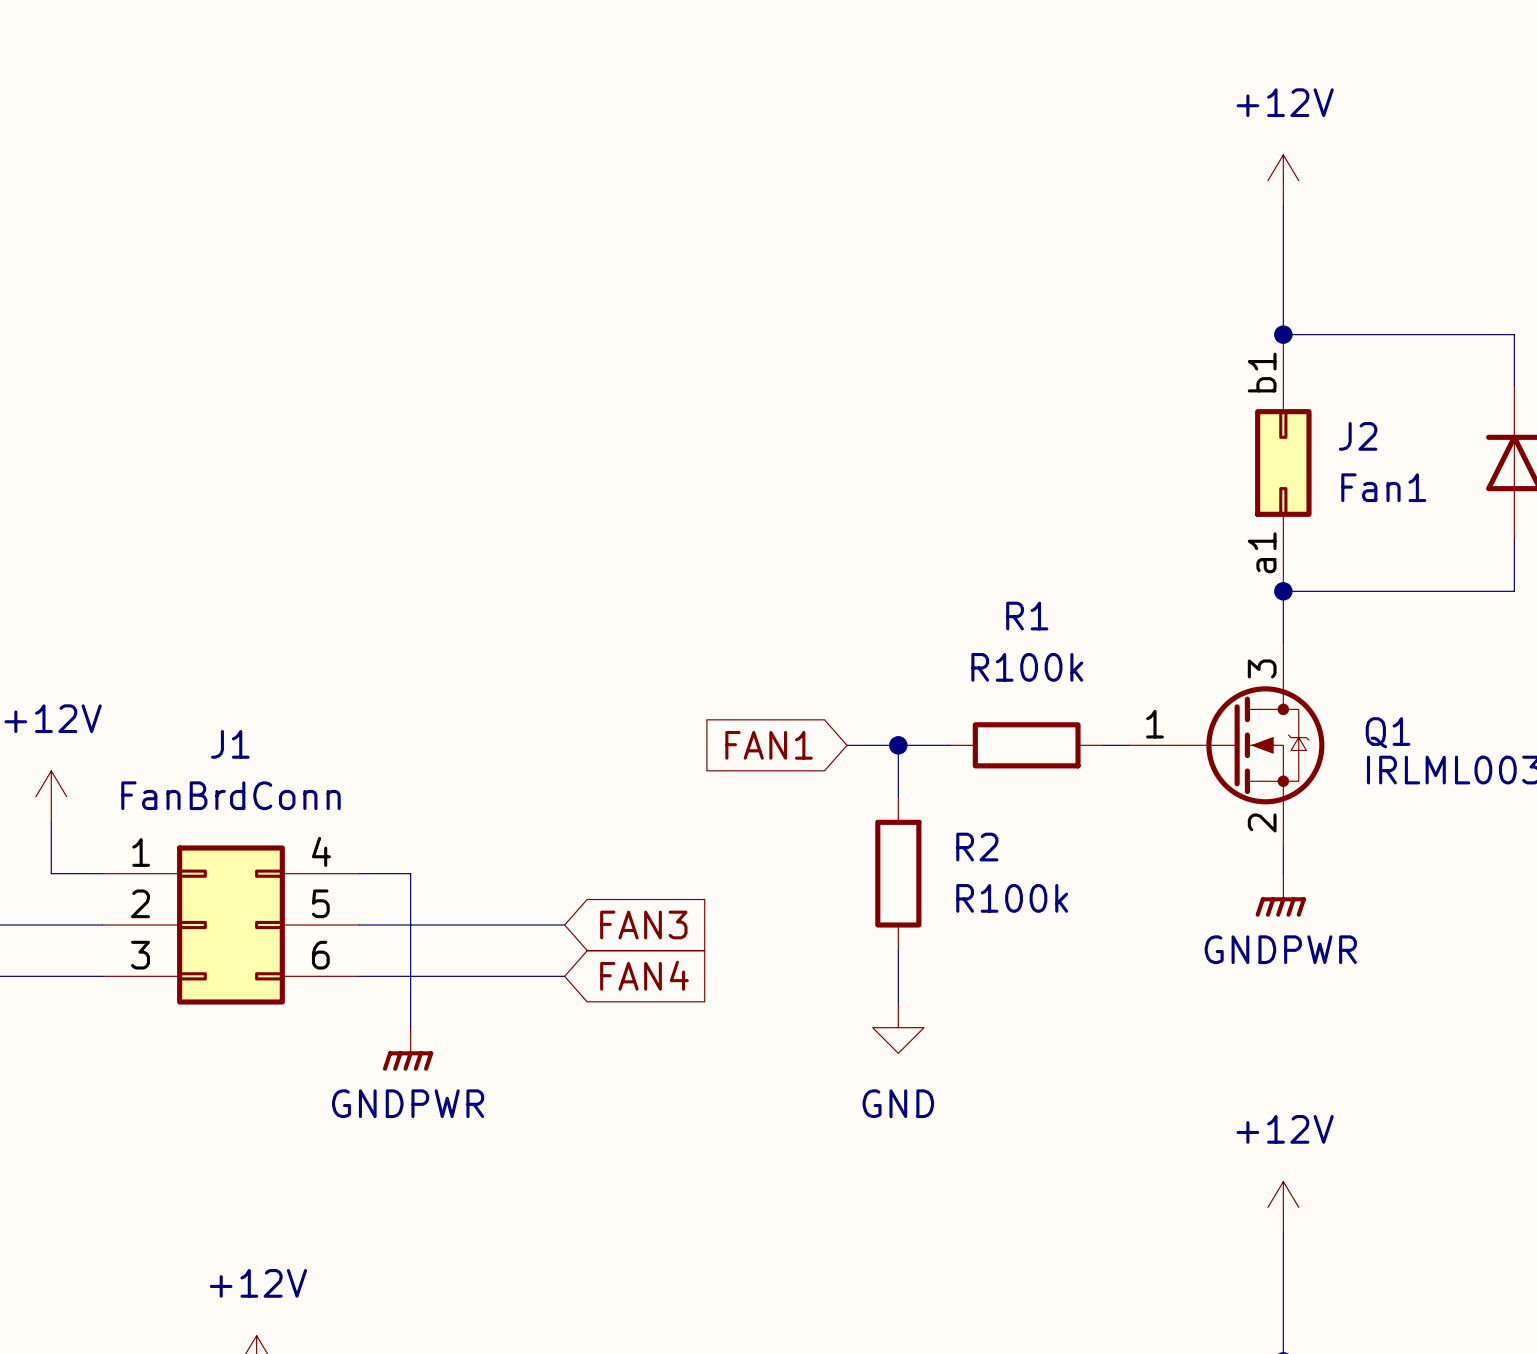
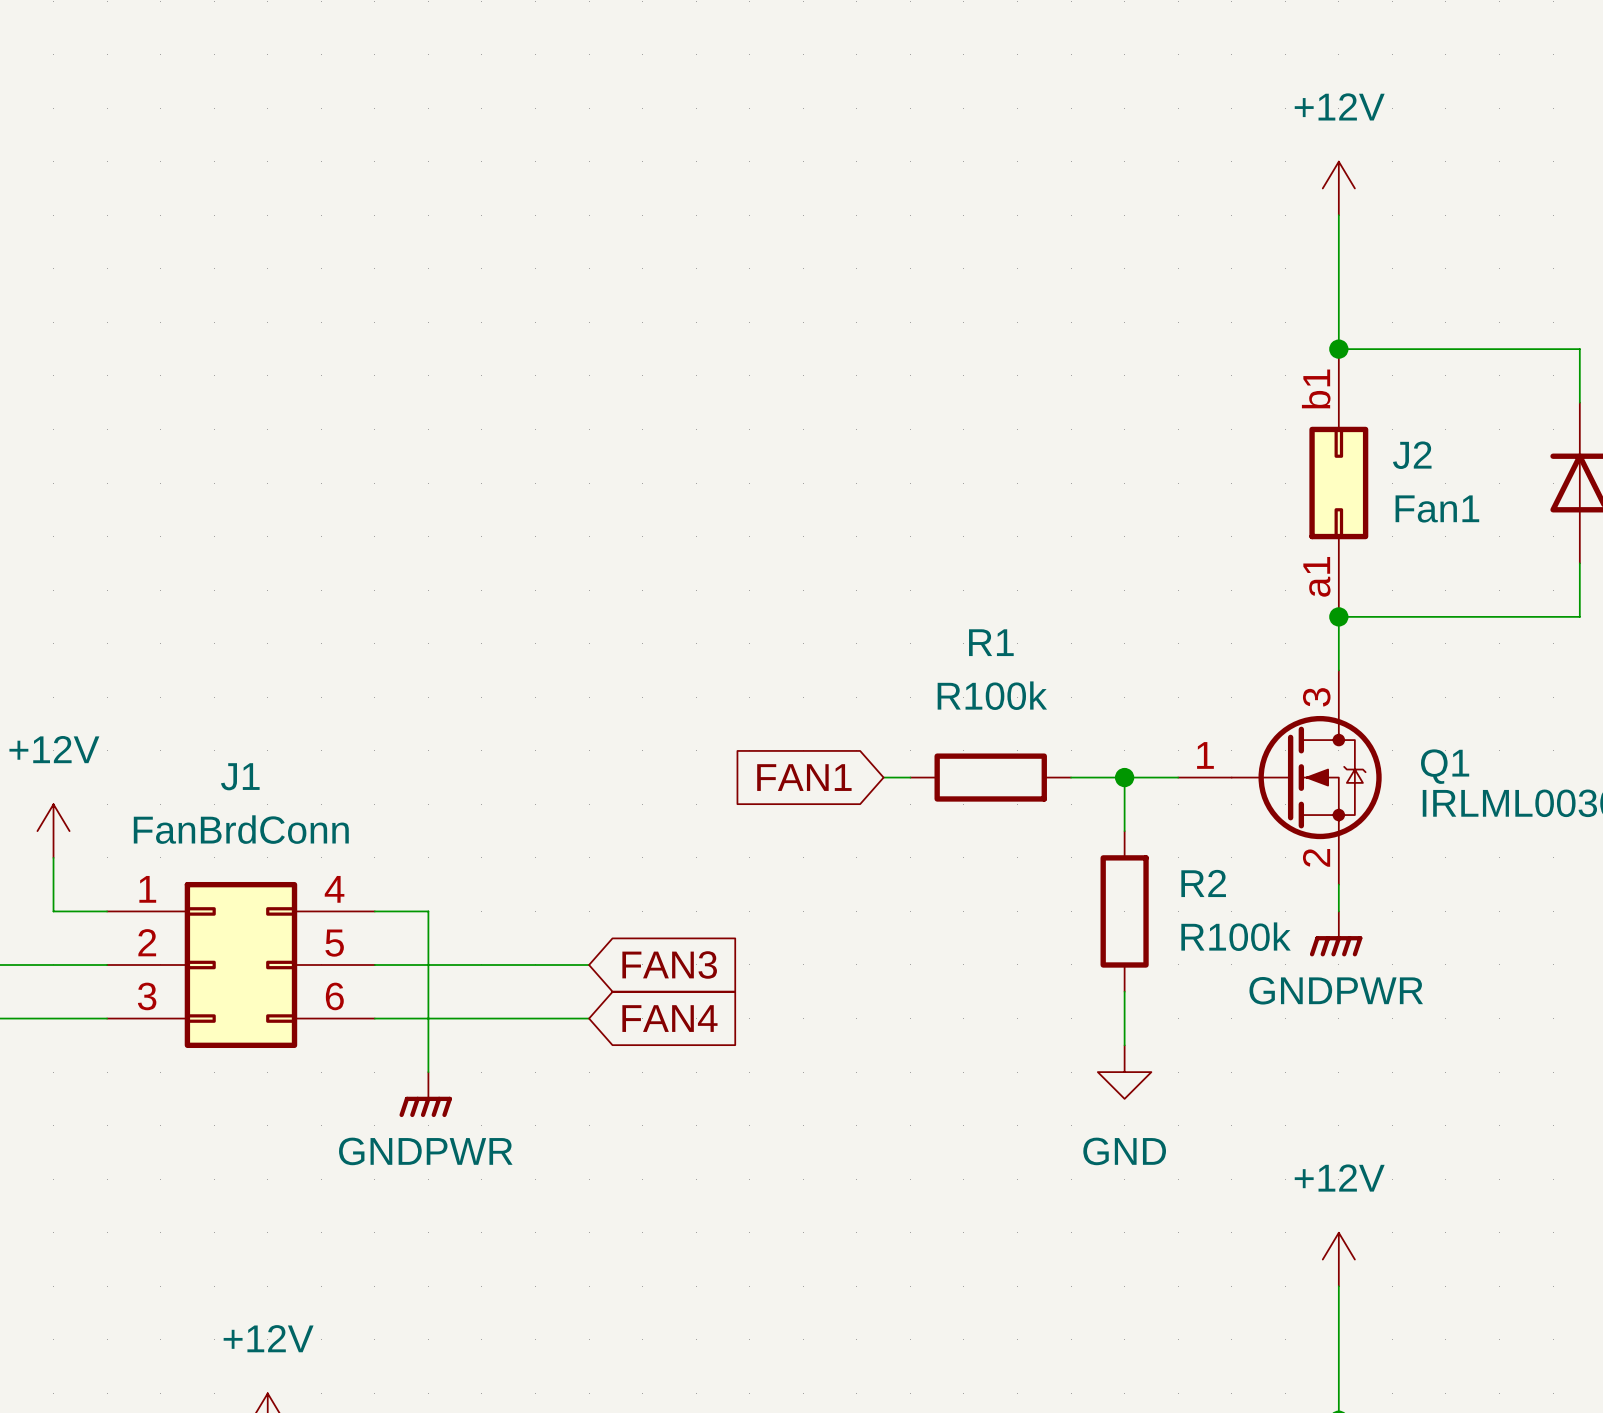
wire: (872, 745) (949, 745) -> (1071, 777) (1151, 777)
wire: (898, 745) (898, 796) -> (1124, 777) (1124, 831)
junction: (898, 745) -> none
R1 position: (1026, 745) -> (990, 777)
junction: none -> (1124, 777)
R2 position: (898, 873) -> (1124, 911)
wire: (898, 950) (898, 1002) -> (1124, 991) (1124, 1045)
power symbol position: GND (898, 1027) -> GND (1124, 1072)

